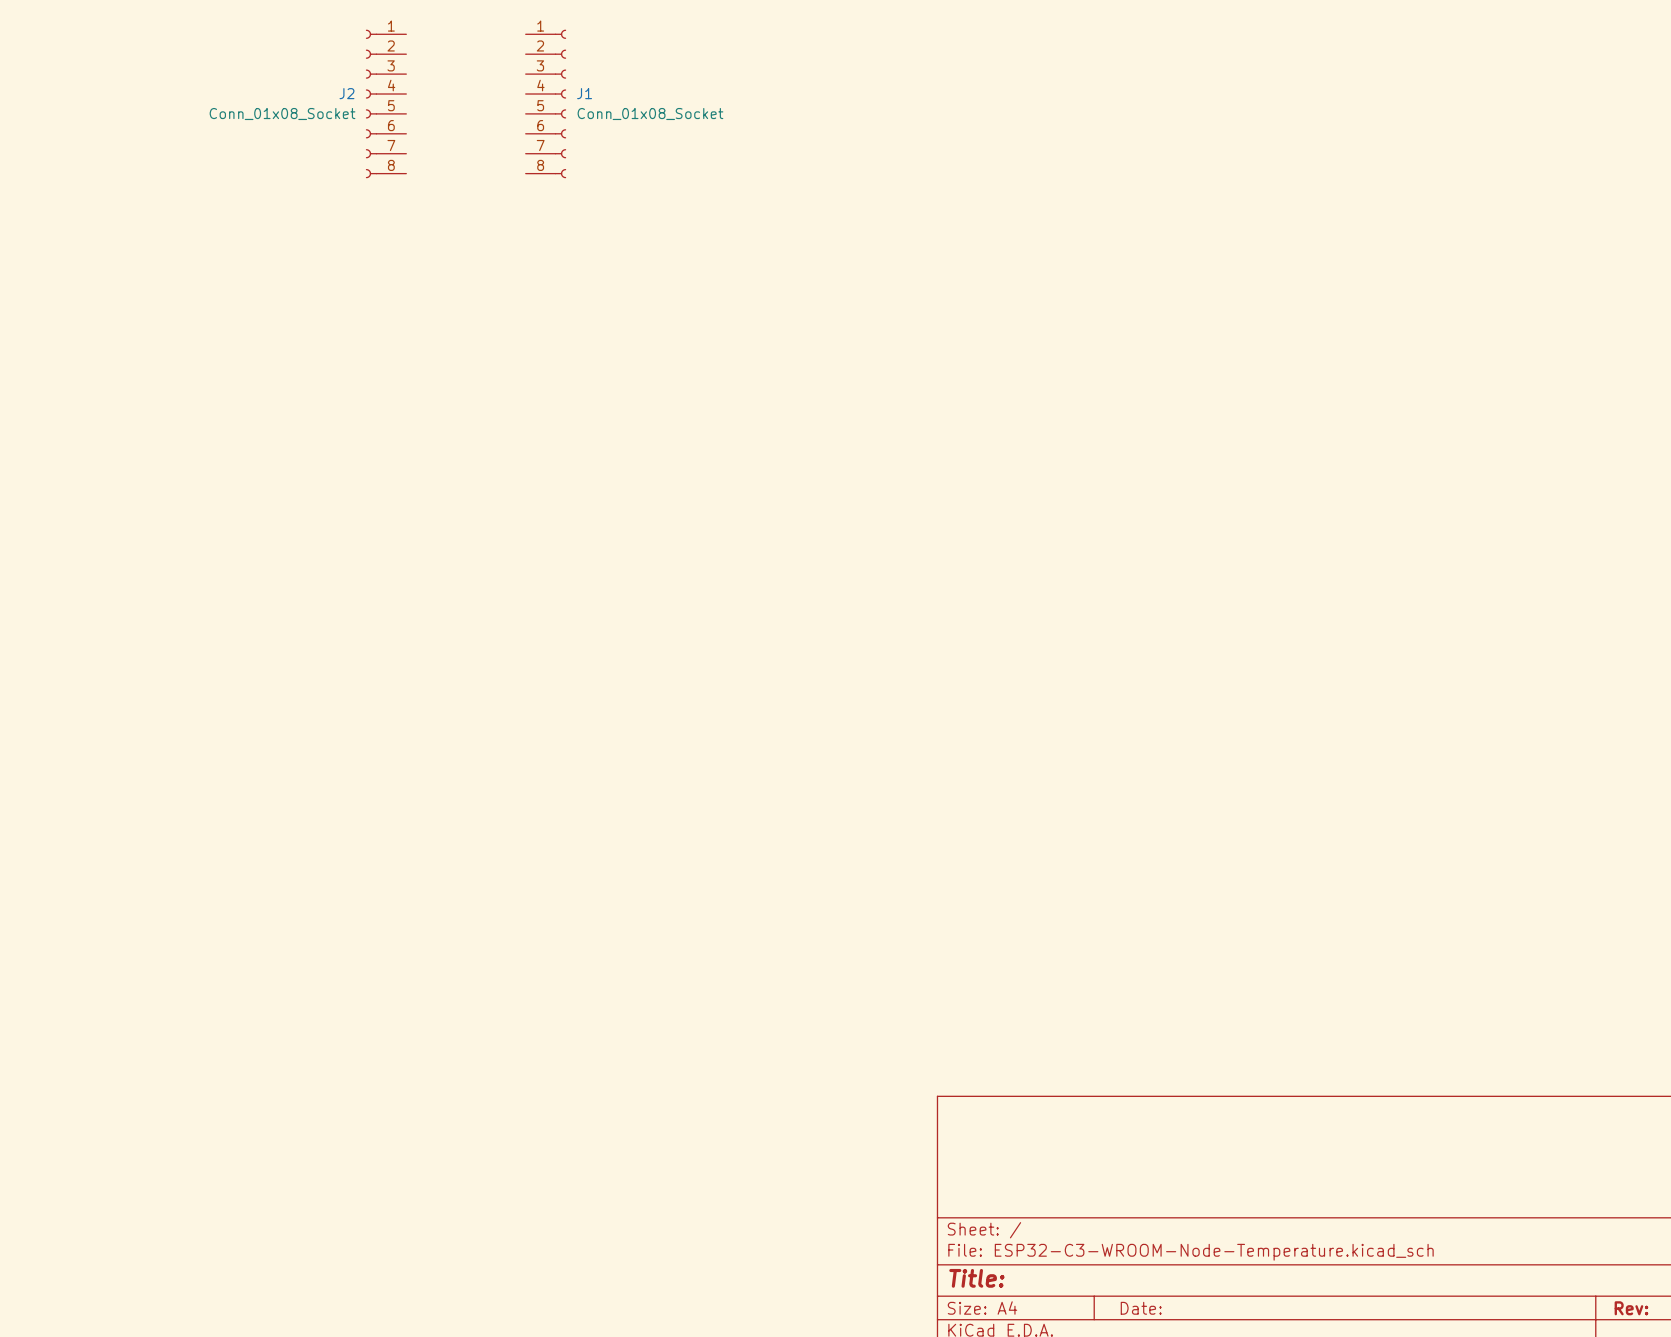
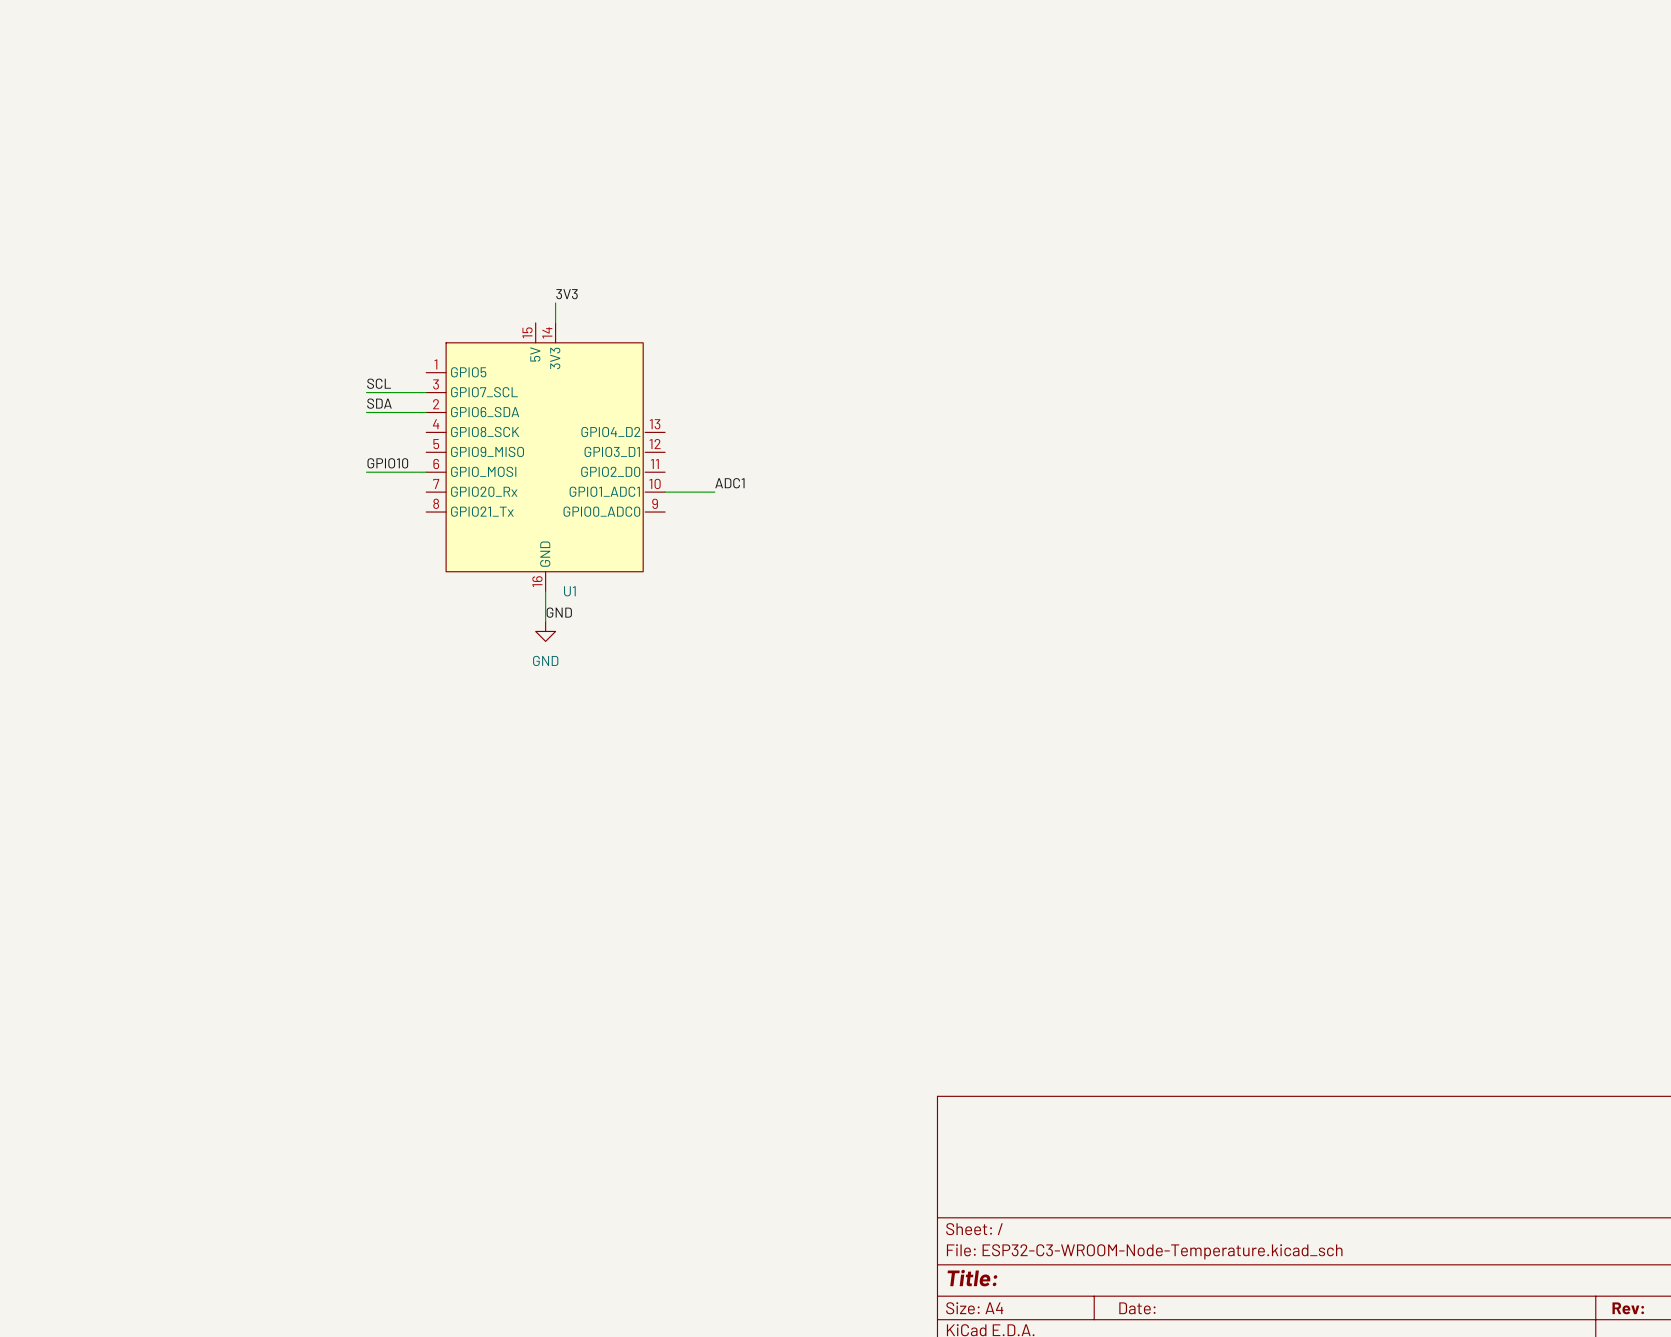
J2: Conn_01x08_Socket (386, 103) -> none
J1: Conn_01x08_Socket (545, 103) -> none
label: none -> 3V3 (566, 294)
wire: none -> (555, 303) (555, 322)
label: none -> SCL (379, 383)
wire: none -> (366, 392) (426, 392)
label: none -> SDA (379, 403)
wire: none -> (366, 412) (426, 412)
U1: none -> (545, 457)
label: none -> GPIO10 (387, 463)
wire: none -> (366, 472) (426, 472)
label: none -> ADC1 (729, 483)
wire: none -> (665, 492) (714, 492)
wire: none -> (545, 591) (545, 621)
label: none -> GND (559, 612)
power symbol: none -> GND (545, 631)

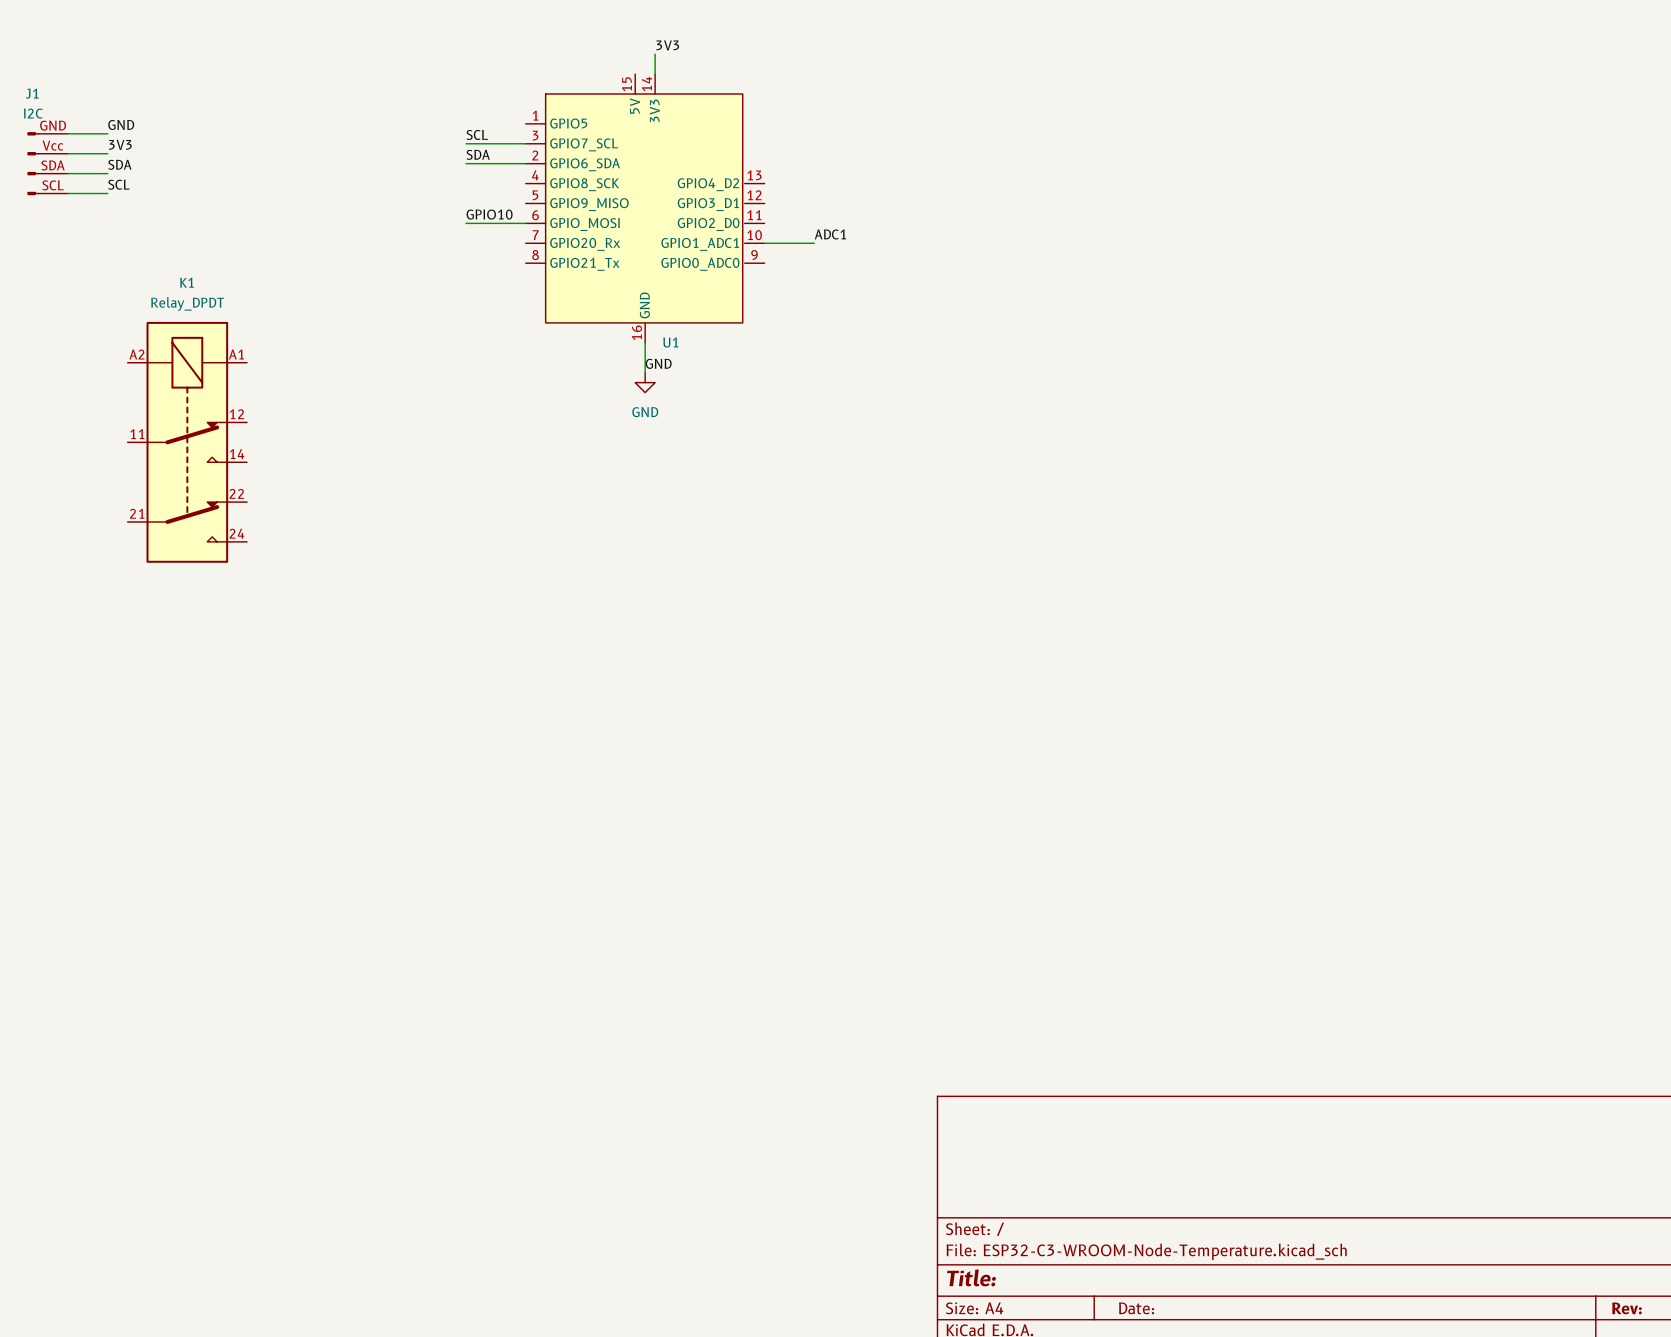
label: none -> 3V3 (667, 45)
wire: none -> (655, 54) (655, 74)
label: none -> GND (121, 124)
wire: none -> (67, 133) (107, 133)
label: none -> SCL (477, 134)
wire: none -> (466, 143) (525, 143)
label: none -> 3V3 (120, 144)
wire: none -> (67, 153) (107, 153)
label: none -> SDA (478, 154)
J1: none -> I2C (47, 163)
wire: none -> (466, 163) (525, 163)
label: none -> SDA (119, 164)
wire: none -> (67, 173) (107, 173)
label: none -> SCL (118, 184)
wire: none -> (67, 193) (107, 193)
label: none -> GPIO10 (489, 214)
wire: none -> (466, 223) (525, 223)
label: none -> ADC1 (830, 234)
wire: none -> (764, 243) (814, 243)
label: 3V3 (566, 294) -> none
wire: none -> (645, 342) (645, 372)
label: none -> GND (658, 363)
power symbol: none -> GND (645, 382)
label: SCL (379, 383) -> none
wire: (366, 392) (426, 392) -> none
label: SDA (379, 403) -> none
wire: (366, 412) (426, 412) -> none
K1: none -> Relay_DPDT (187, 442)
U1 position: (545, 457) -> (645, 208)
label: GPIO10 (387, 463) -> none
wire: (366, 472) (426, 472) -> none
label: ADC1 (729, 483) -> none
wire: (665, 492) (714, 492) -> none
wire: (545, 591) (545, 621) -> none
label: GND (559, 612) -> none
power symbol: GND (545, 631) -> none

